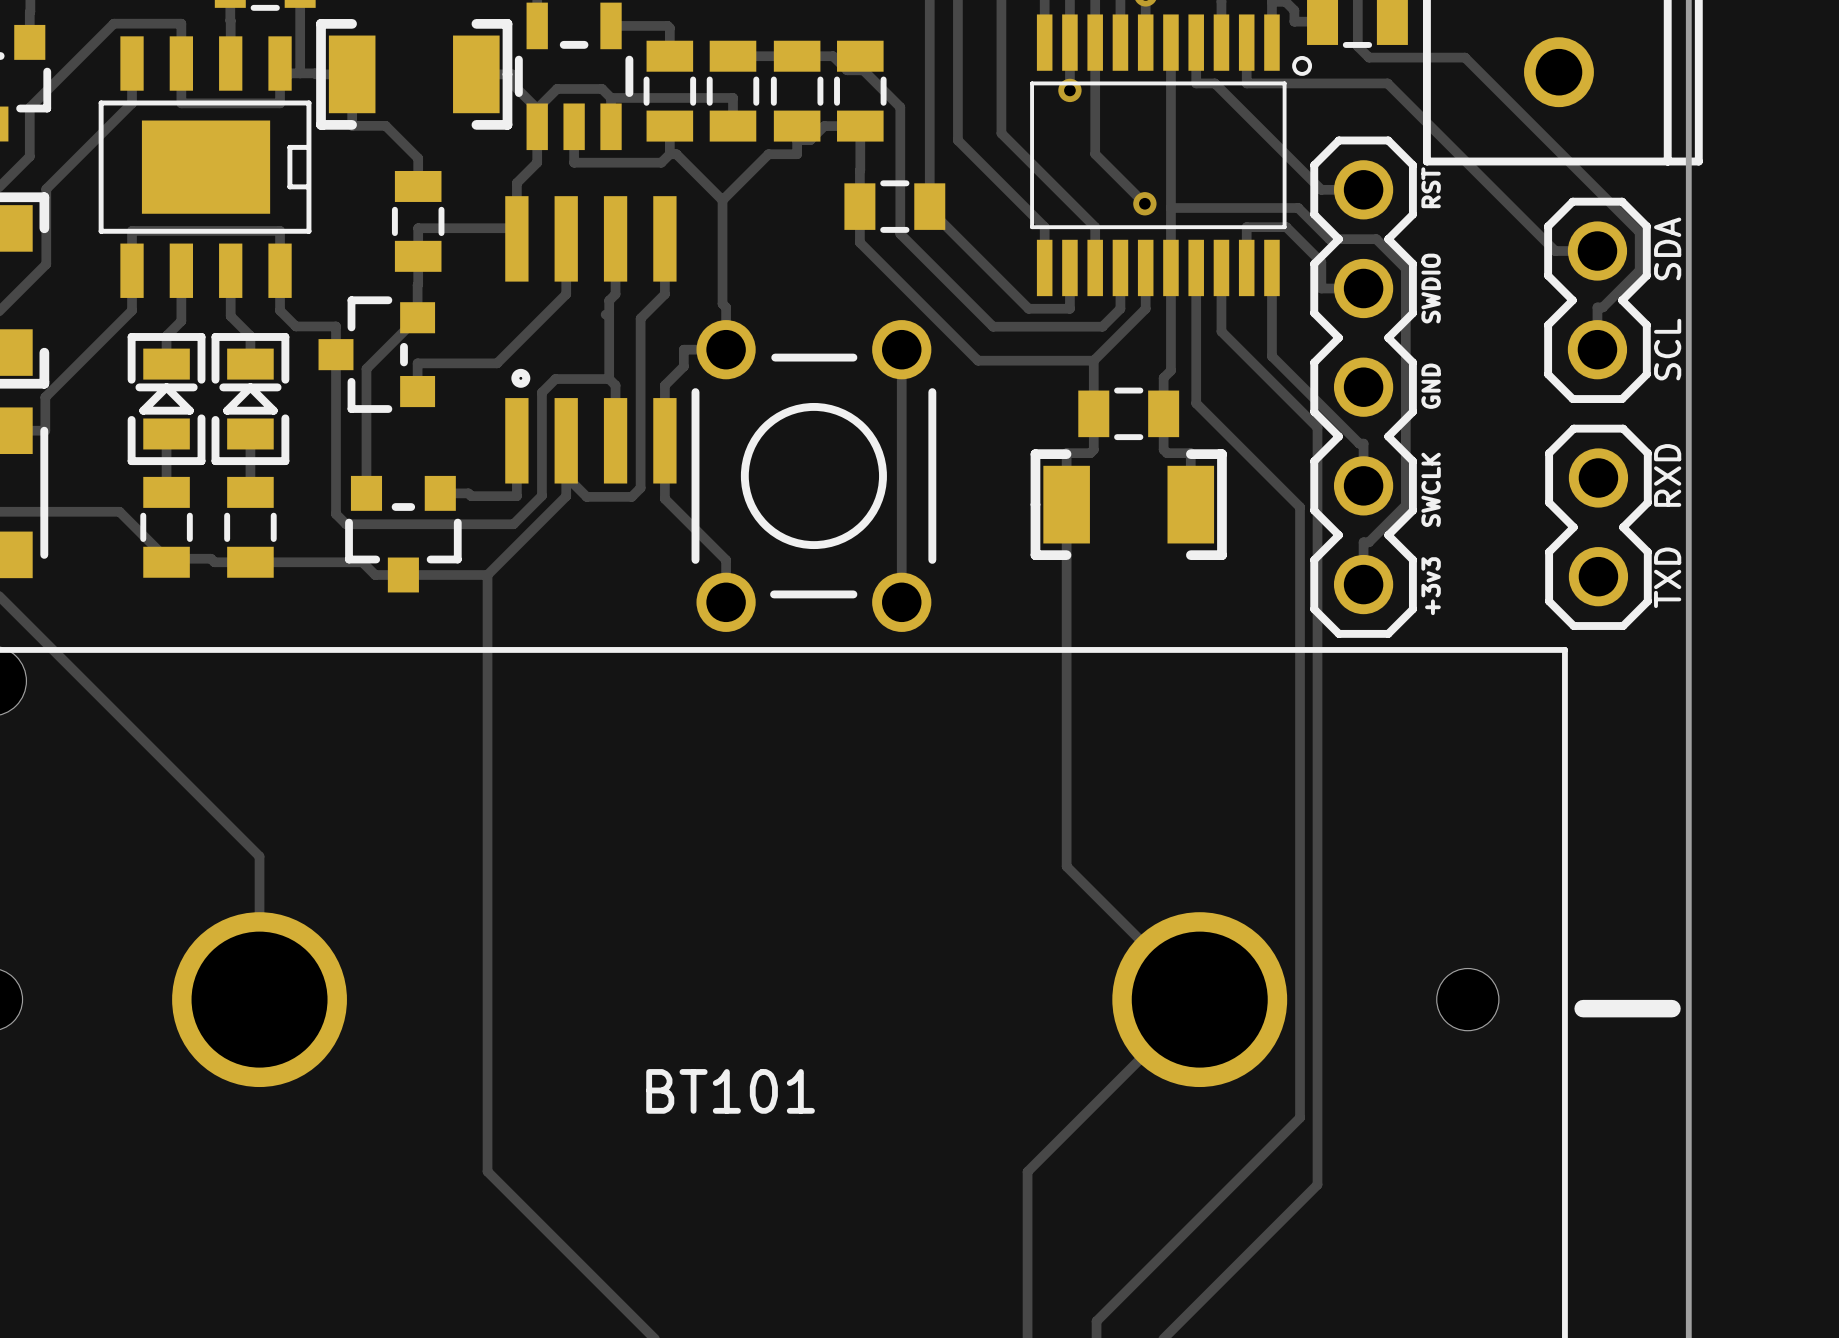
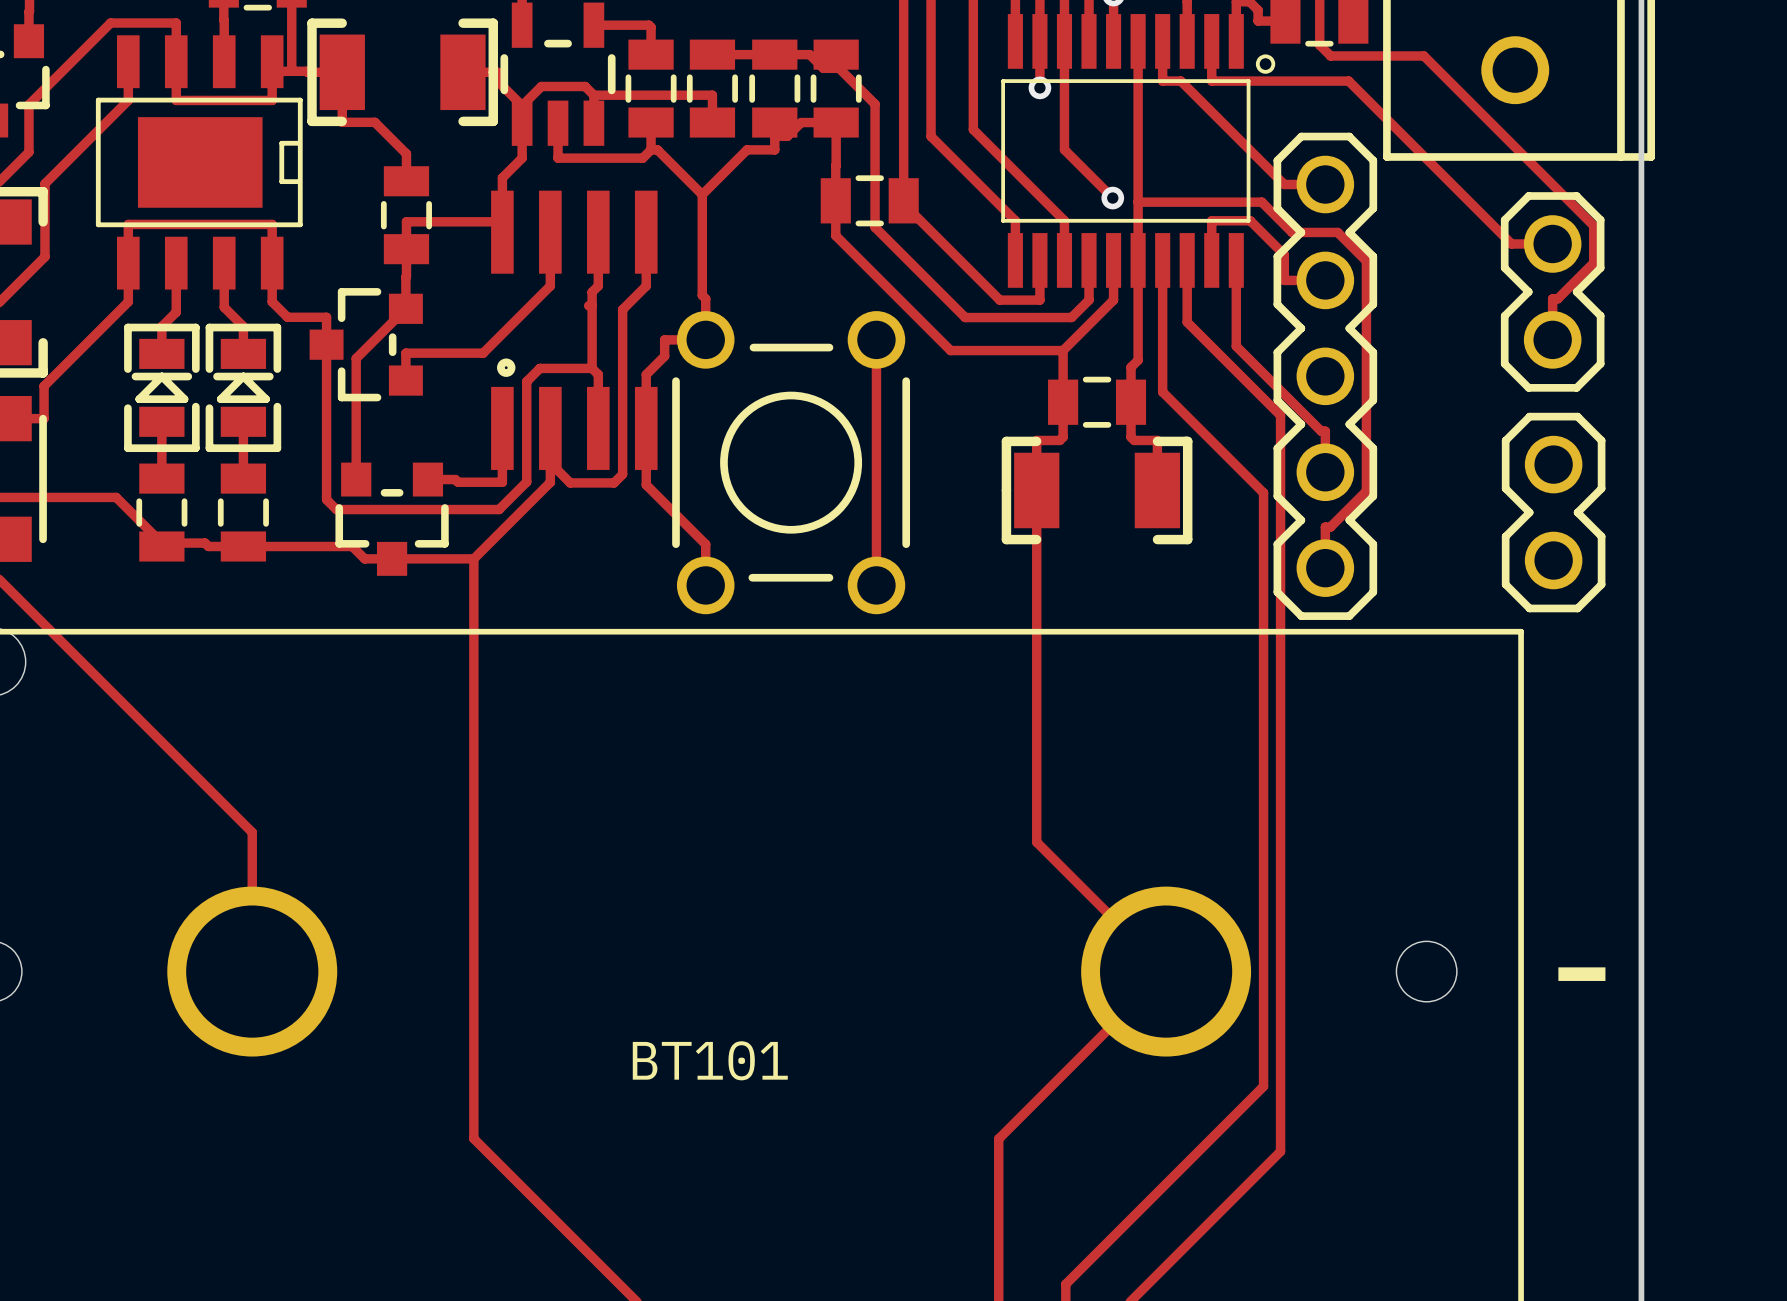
text: RST (1431, 187) -> none
text: SDA (1667, 248) -> none
text: SWDIO (1431, 288) -> none
text: SCL (1667, 349) -> none
text: GND (1431, 386) -> none
text: RXD (1667, 475) -> none
text: SWCLK (1431, 489) -> none
text: TXD (1667, 577) -> none
text: +3v3 (1431, 586) -> none

